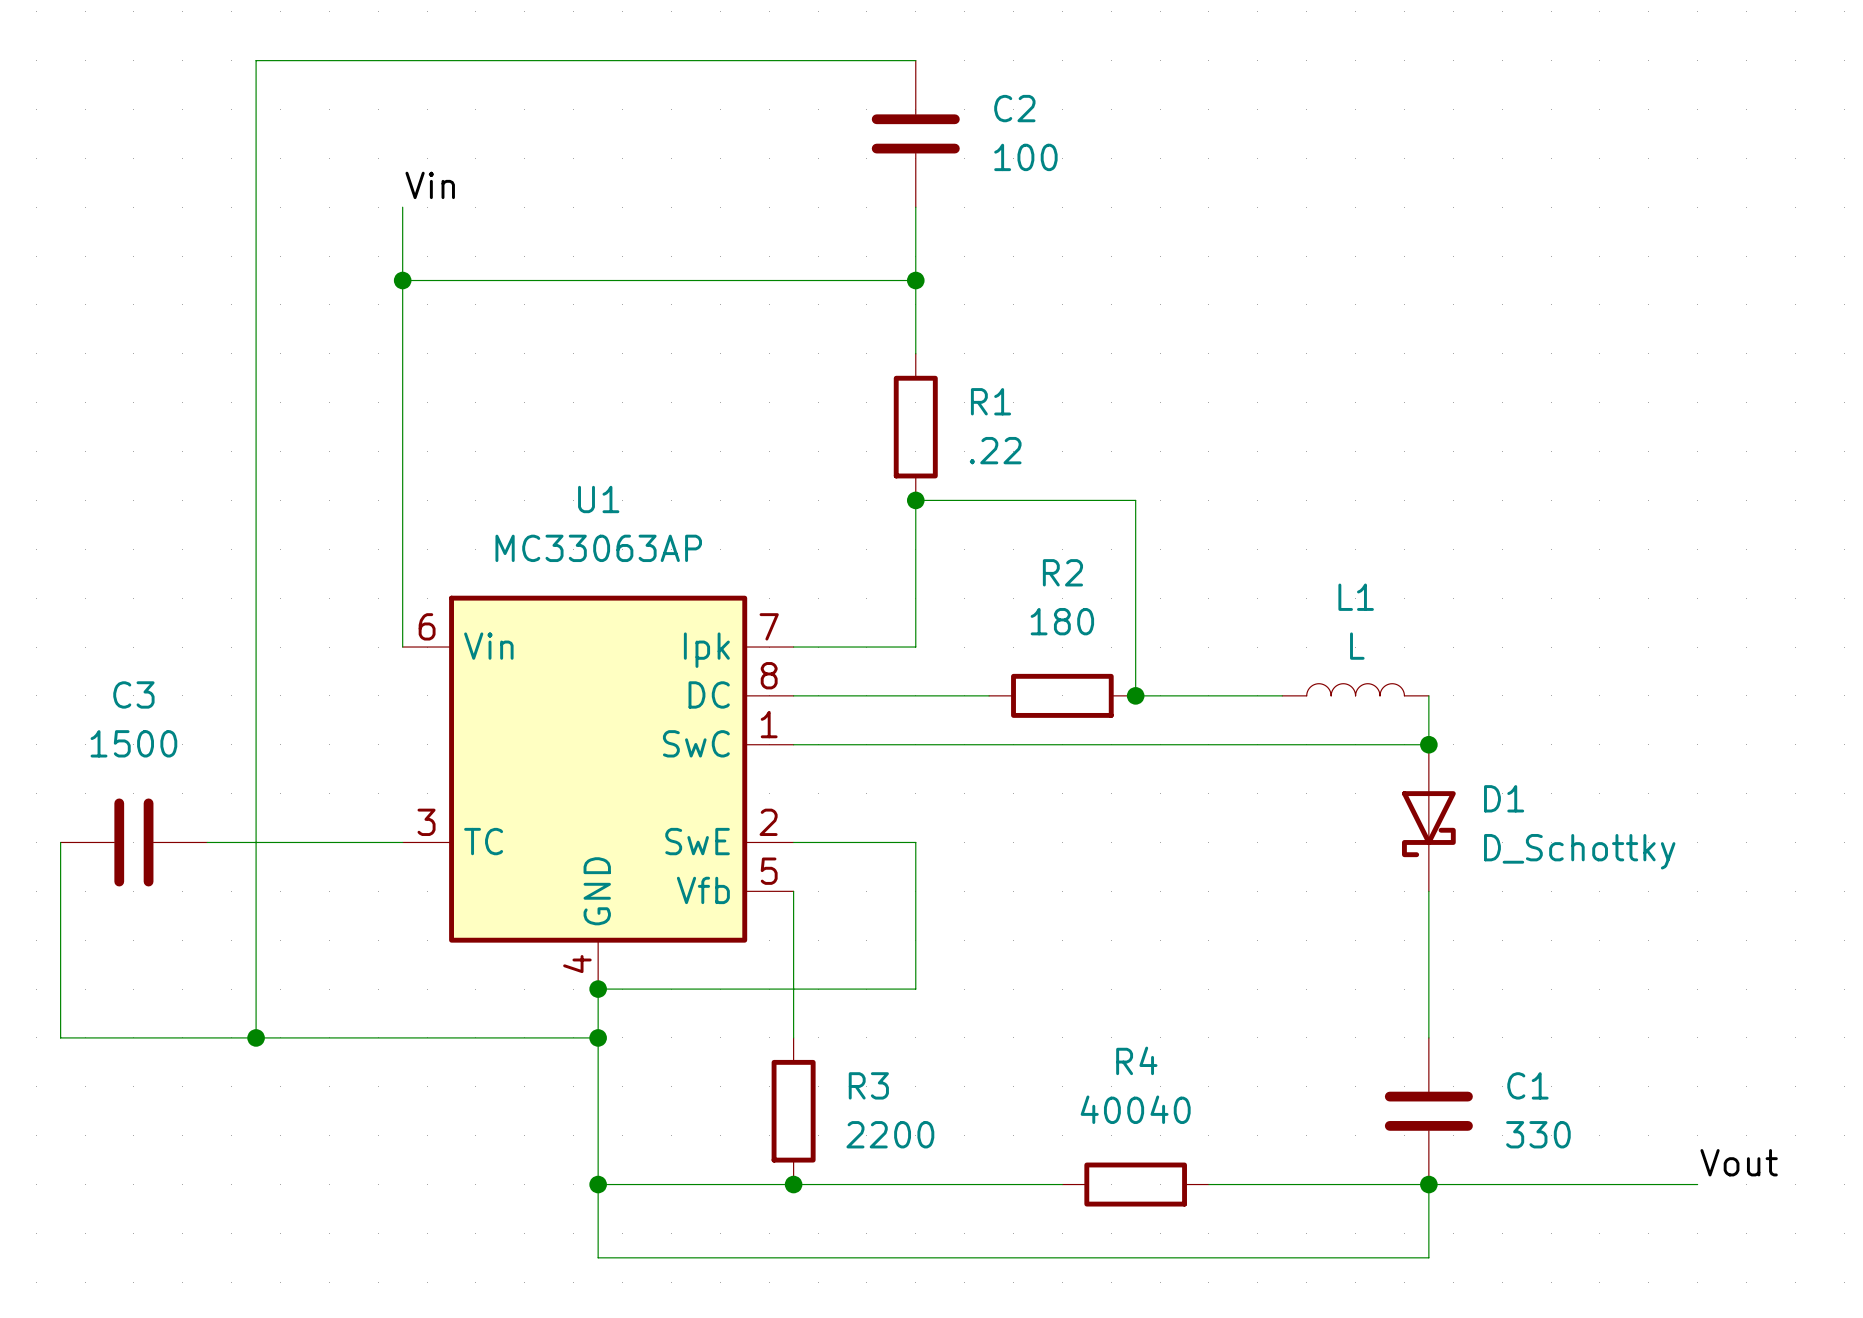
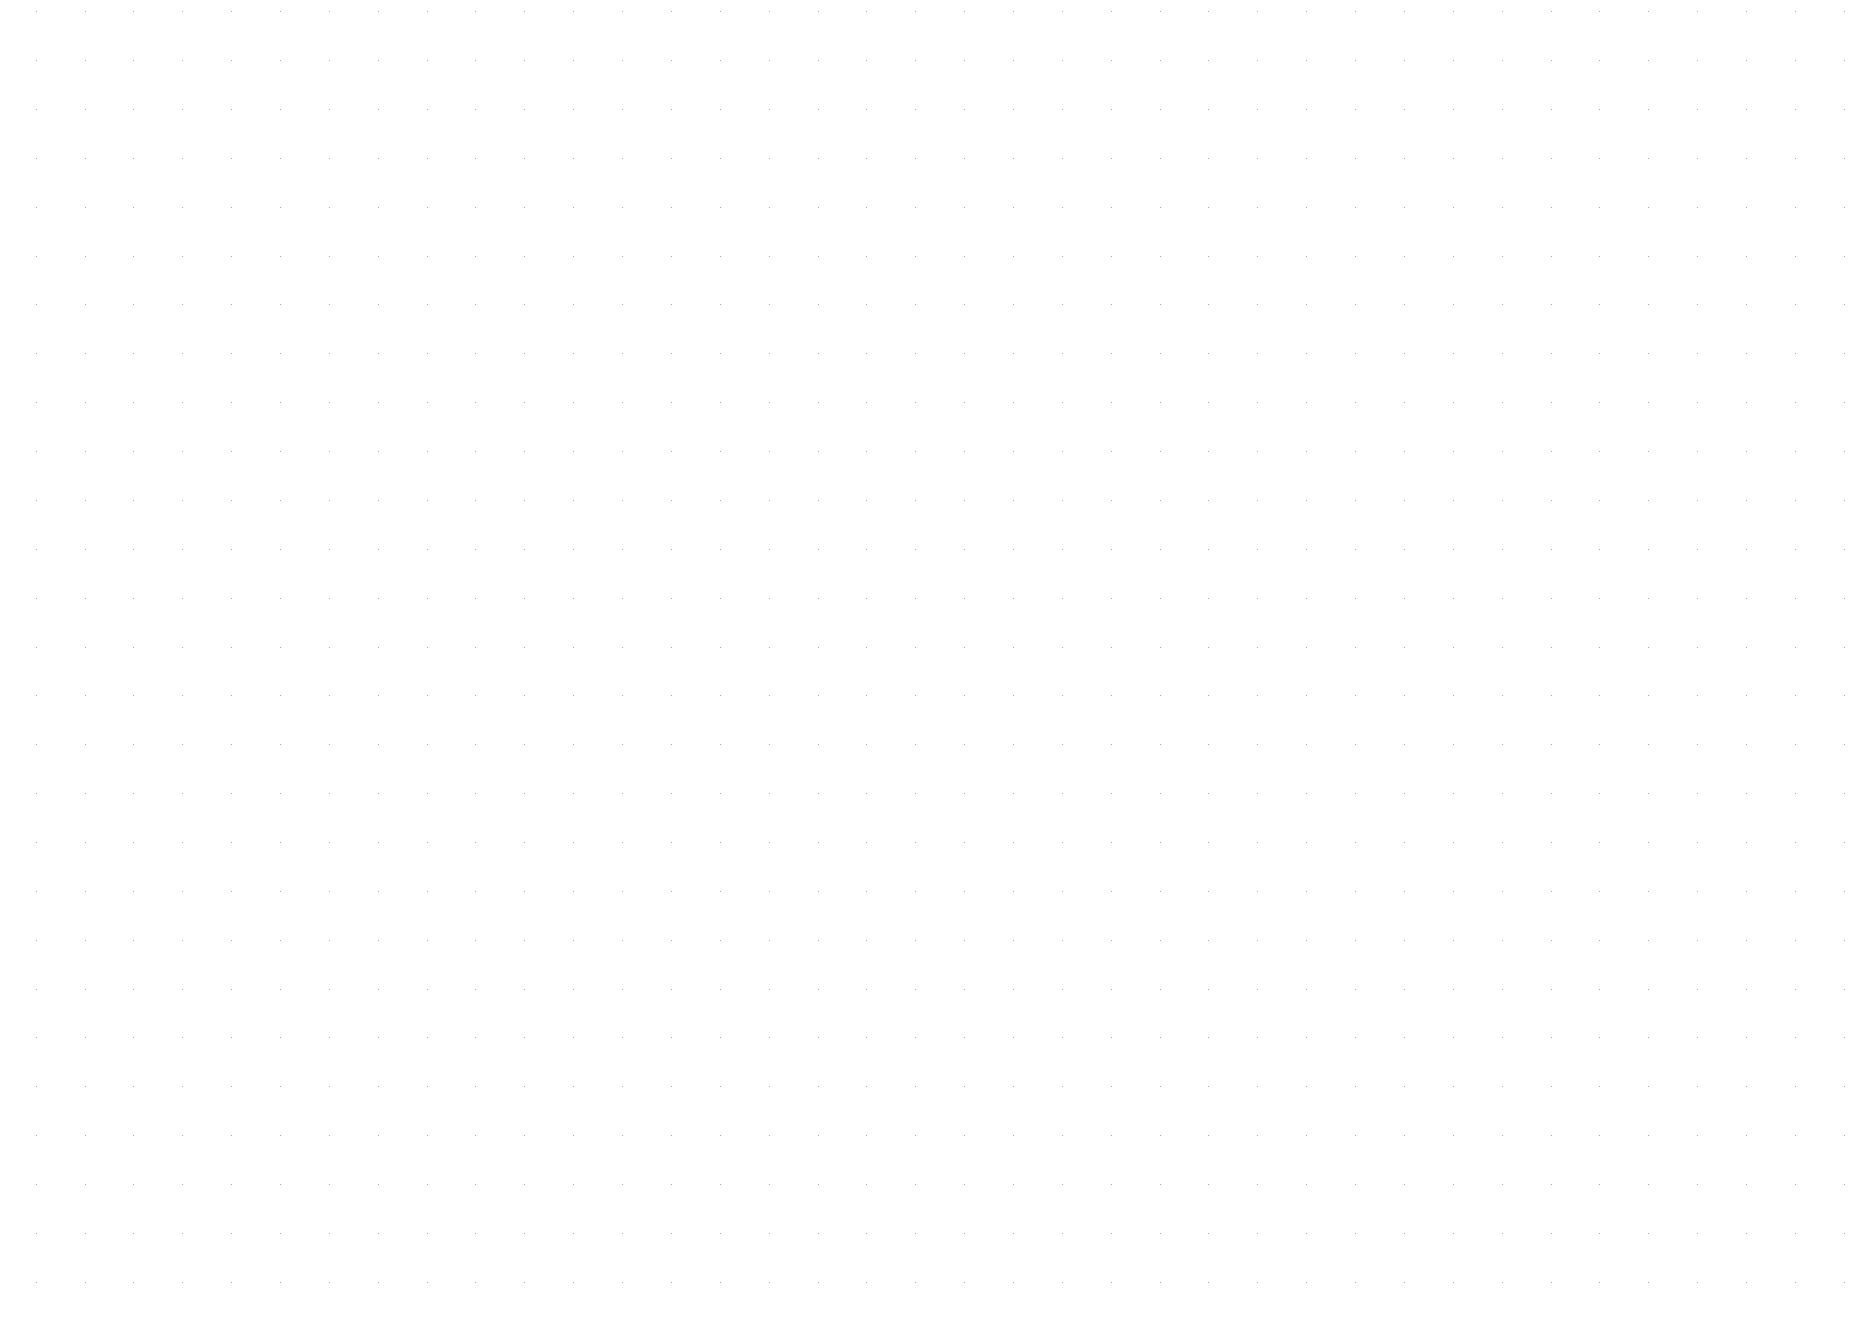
wire: (915, 60) (256, 60) (256, 1037) -> none
C2: 100 (915, 133) -> none
label: Vin (430, 185) -> none
wire: (402, 207) (402, 647) -> none
wire: (915, 207) (915, 353) -> none
wire: (402, 280) (915, 280) -> none
junction: (402, 280) -> none
junction: (915, 280) -> none
R1: .22 (915, 427) -> none
junction: (915, 500) -> none
wire: (793, 647) (915, 647) (915, 500) (1135, 500) (1135, 695) (1282, 695) -> none
L1: L (1355, 689) -> none
wire: (793, 695) (989, 695) -> none
R2: 180 (1062, 695) -> none
junction: (1135, 695) -> none
wire: (1428, 695) (1428, 744) (793, 744) -> none
junction: (1428, 744) -> none
U1: MC33063AP (598, 792) -> none
D1: D_Schottky (1428, 818) -> none
wire: (60, 842) (60, 1037) (598, 1037) -> none
C3: 1500 (133, 842) -> none
wire: (207, 842) (402, 842) -> none
wire: (793, 842) (915, 842) (915, 989) (598, 989) (598, 1257) (1428, 1257) (1428, 1184) -> none
wire: (793, 891) (793, 1037) -> none
wire: (1428, 891) (1428, 1037) -> none
junction: (598, 989) -> none
junction: (256, 1037) -> none
junction: (598, 1037) -> none
R3: 2200 (793, 1111) -> none
C1: 330 (1428, 1111) -> none
label: Vout (1739, 1162) -> none
wire: (598, 1184) (1062, 1184) -> none
junction: (598, 1184) -> none
junction: (793, 1184) -> none
R4: 40040 (1135, 1184) -> none
wire: (1208, 1184) (1697, 1184) -> none
junction: (1428, 1184) -> none

